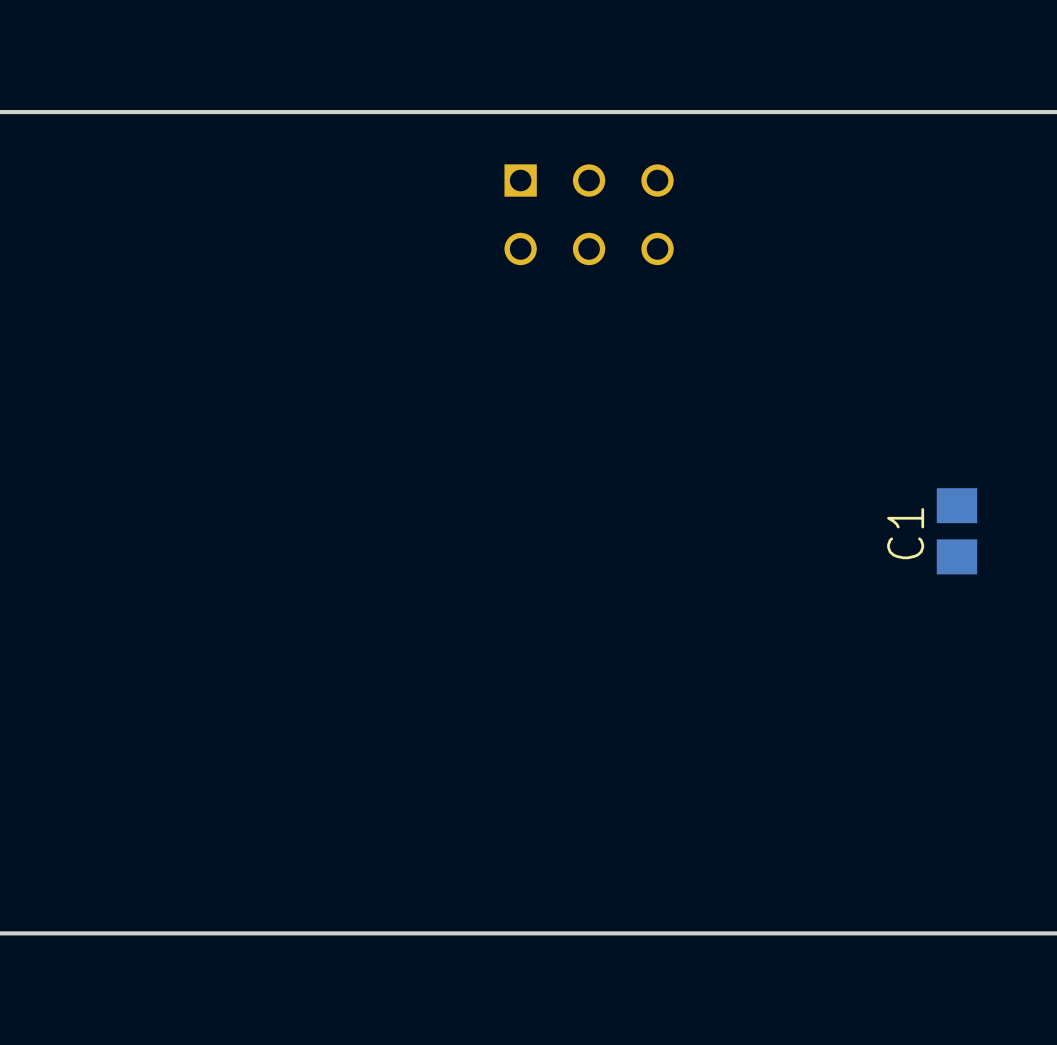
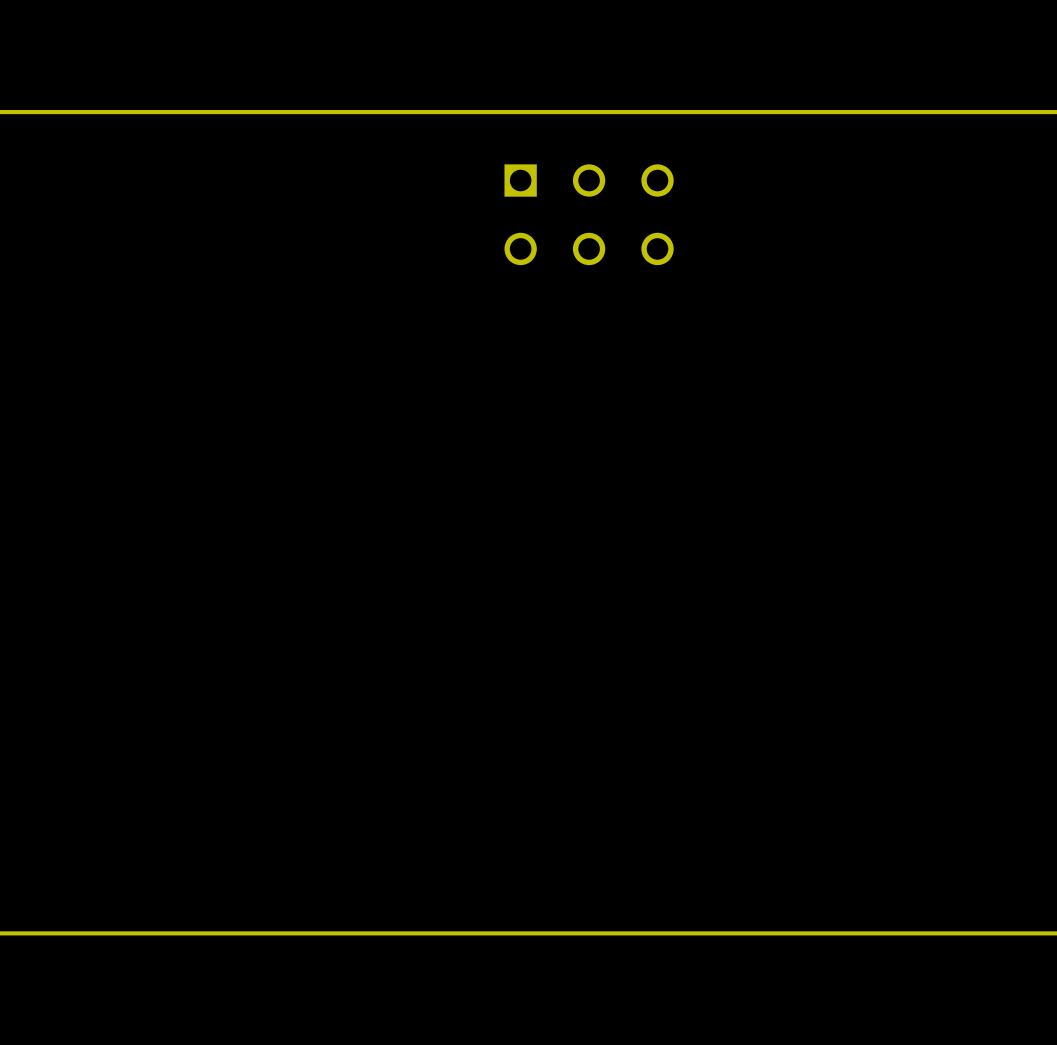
C1: (956, 531) -> none

